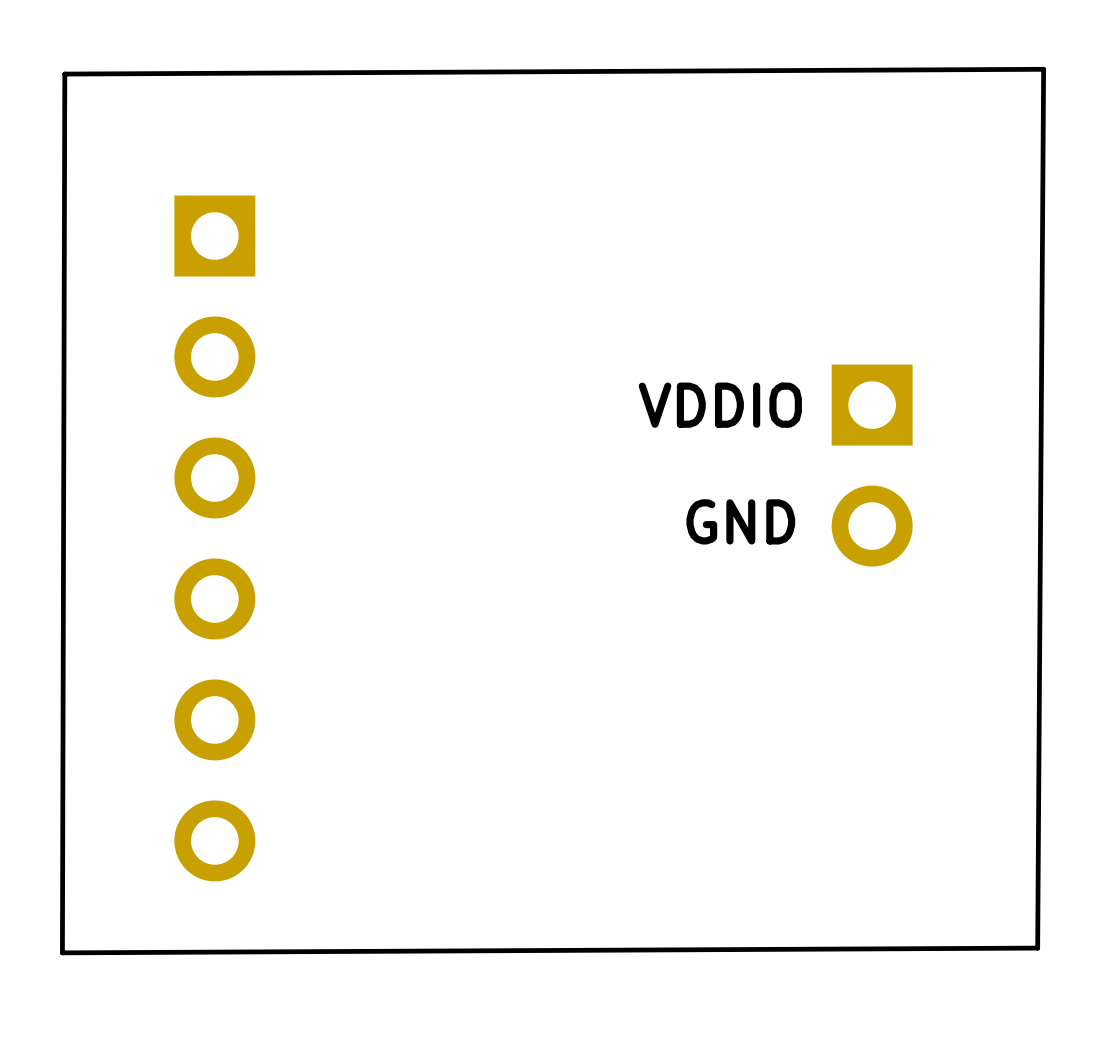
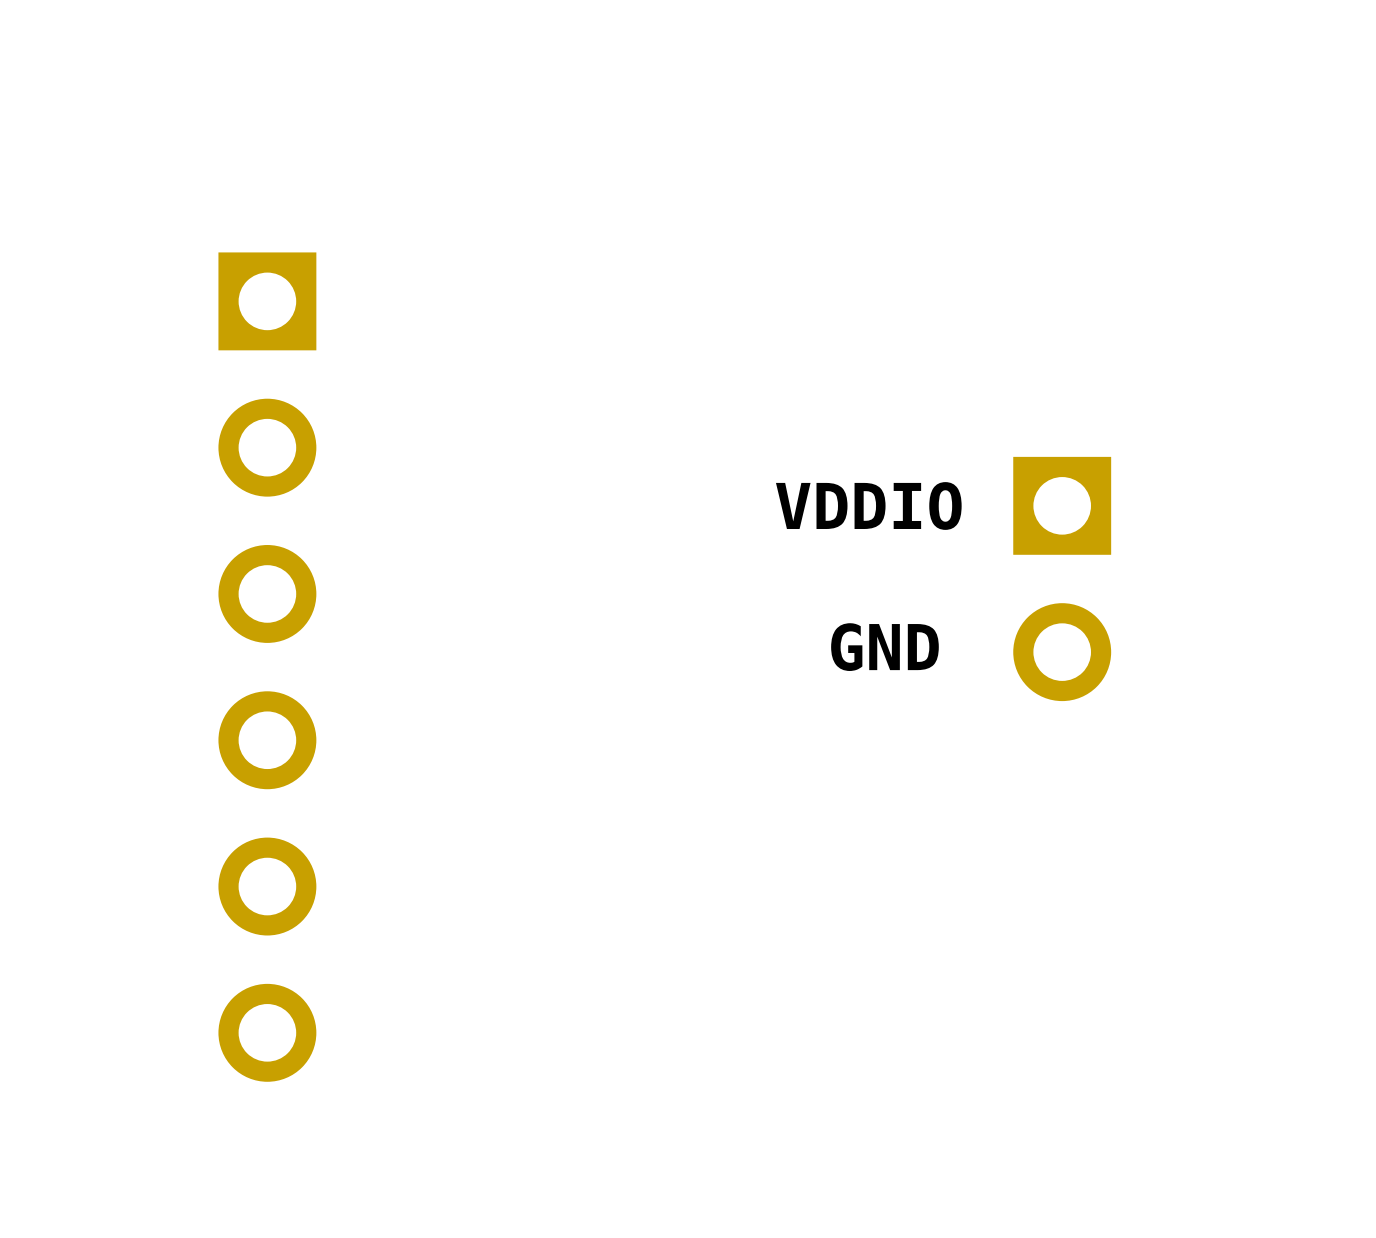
board edge: (1043, 69) (64, 74) (62, 952) (1037, 948) (1043, 69) -> none

